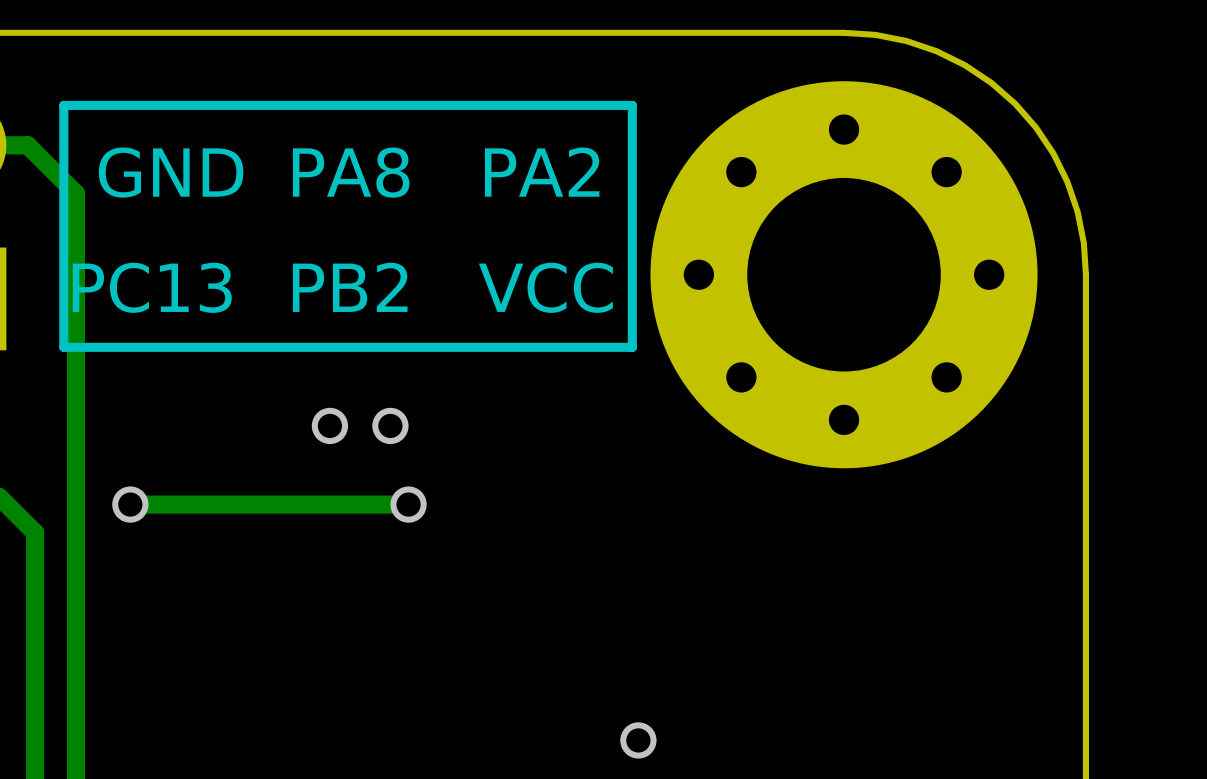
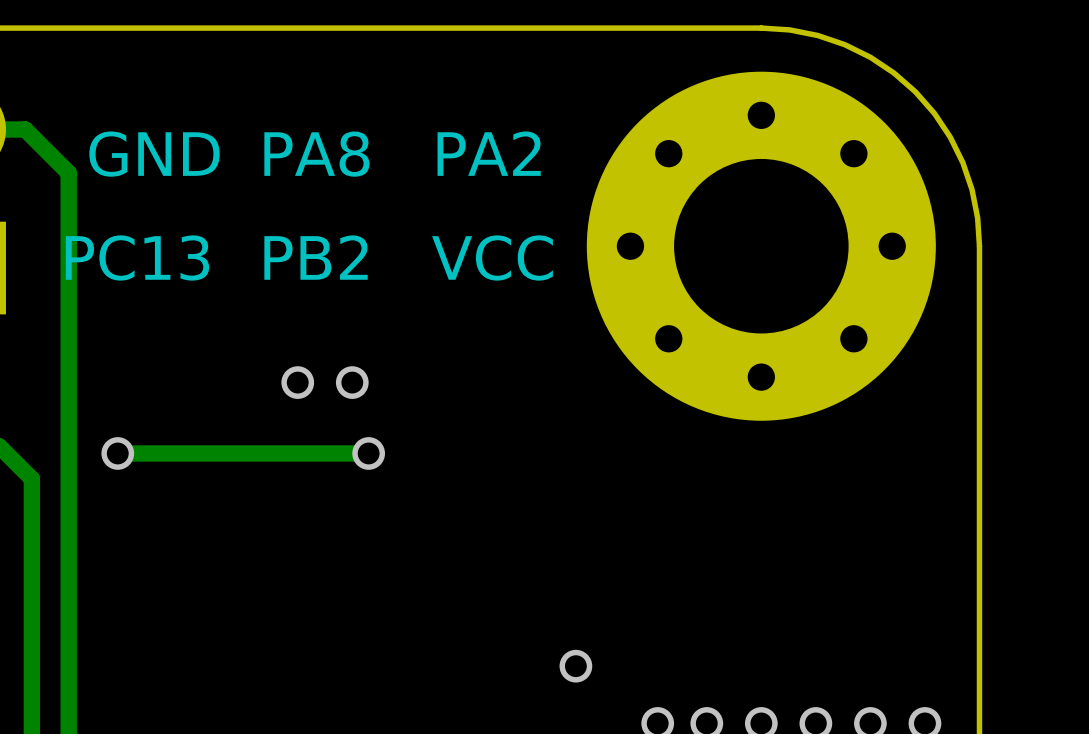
line: (632, 105) (63, 105) (63, 347) (632, 347) (632, 105) -> none

